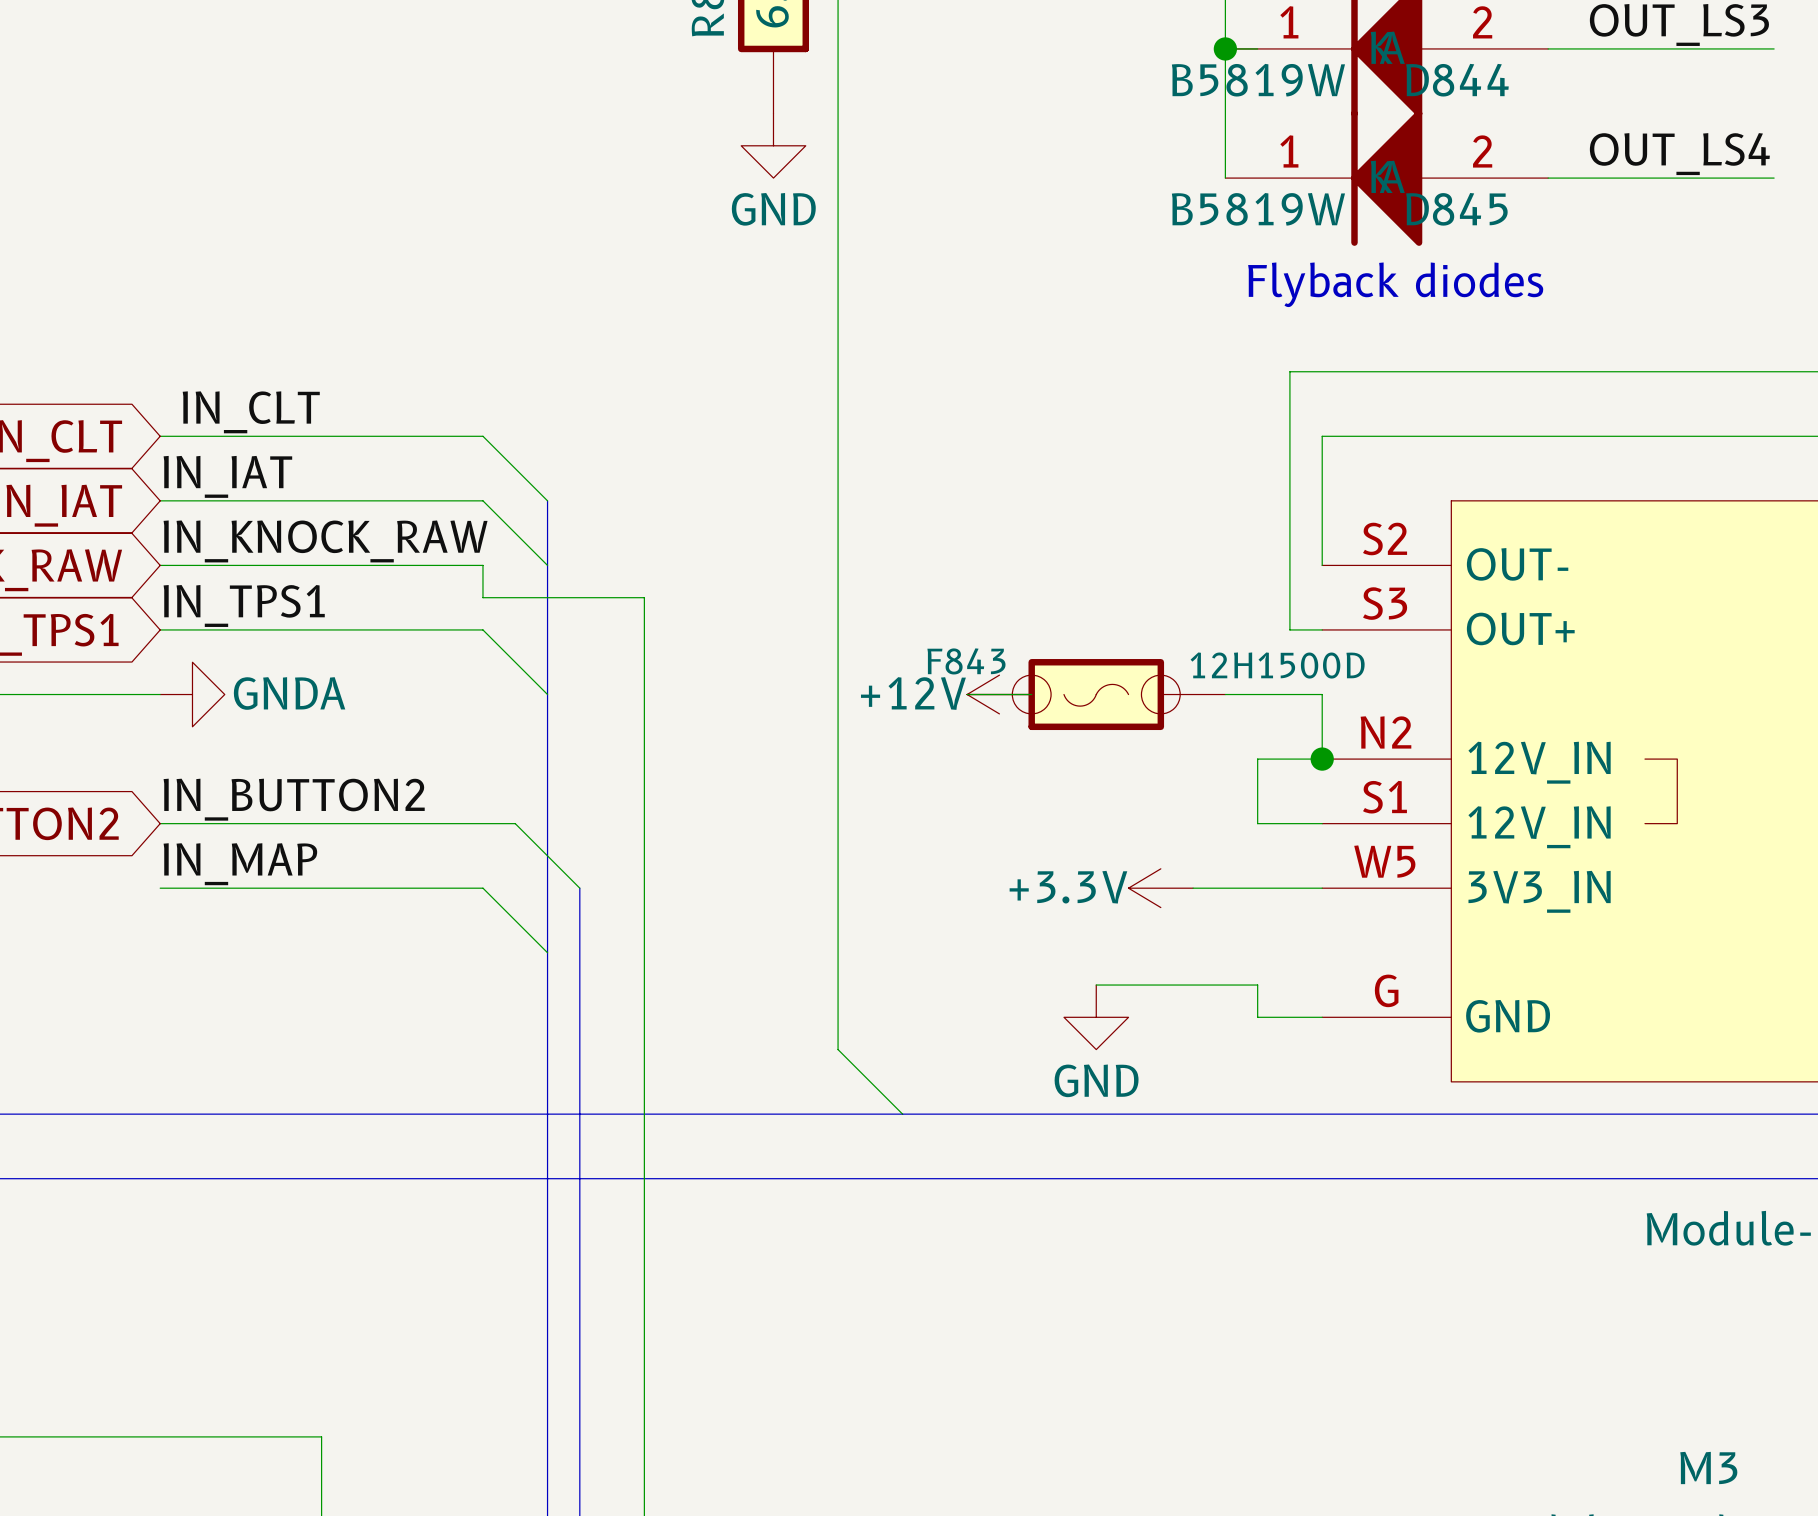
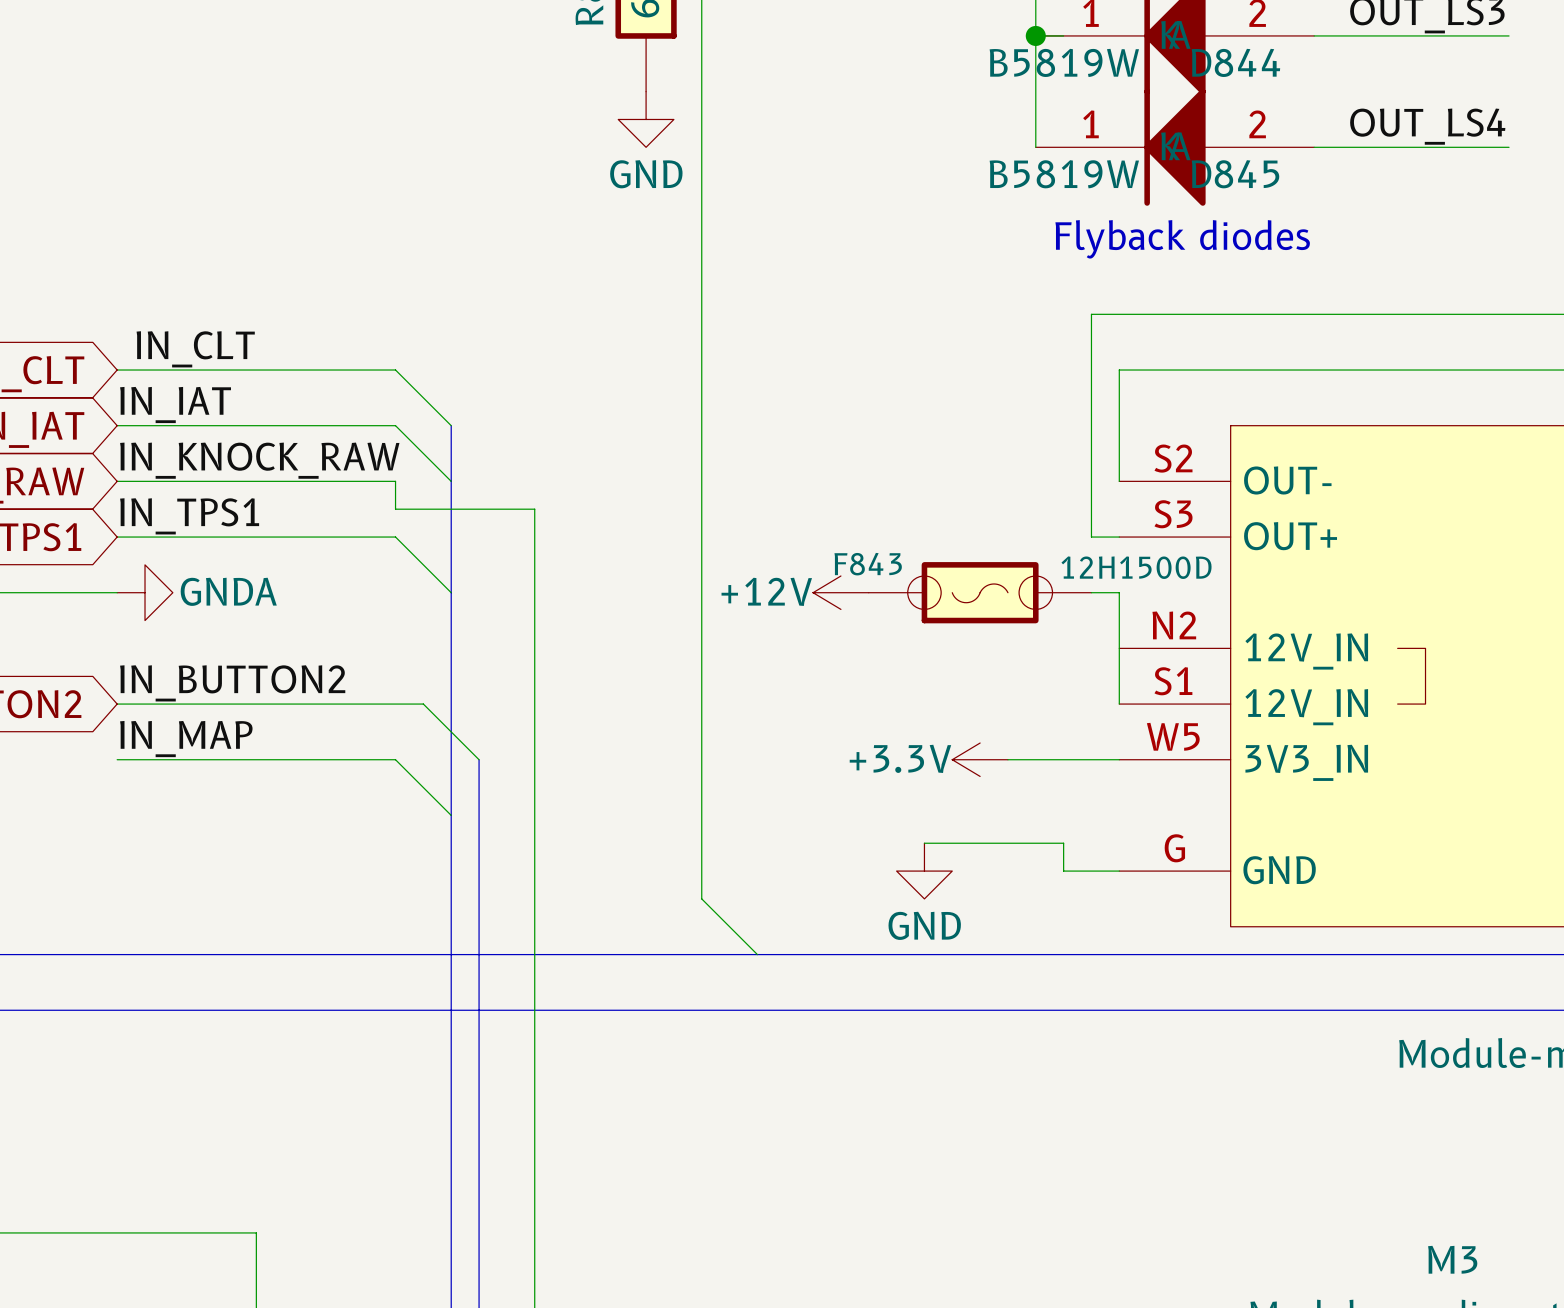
F843 position: (1096, 694) -> (980, 592)
wire: (1322, 759) (1257, 759) (1257, 823) (1322, 823) -> (1119, 648) (1119, 704)
junction: (1322, 759) -> none

